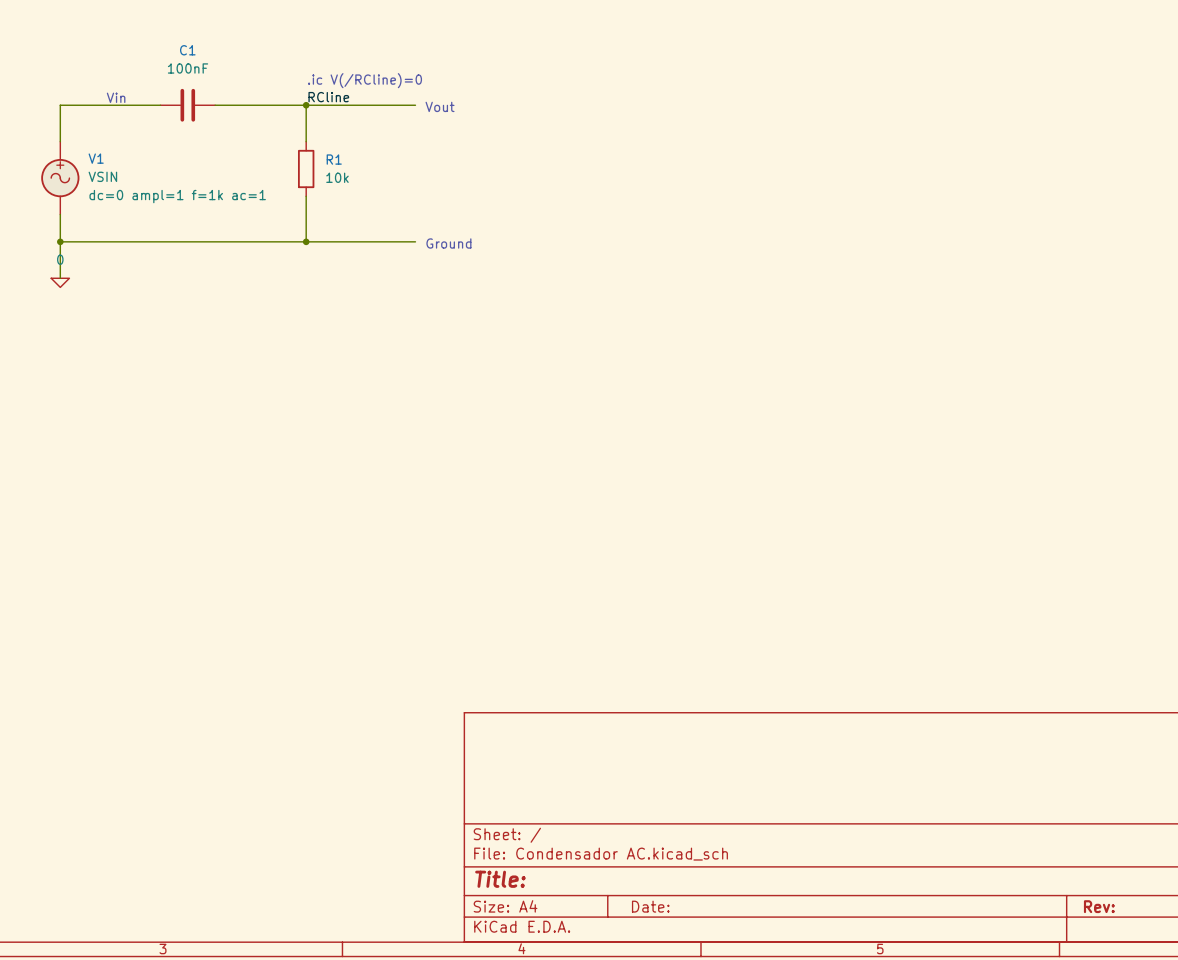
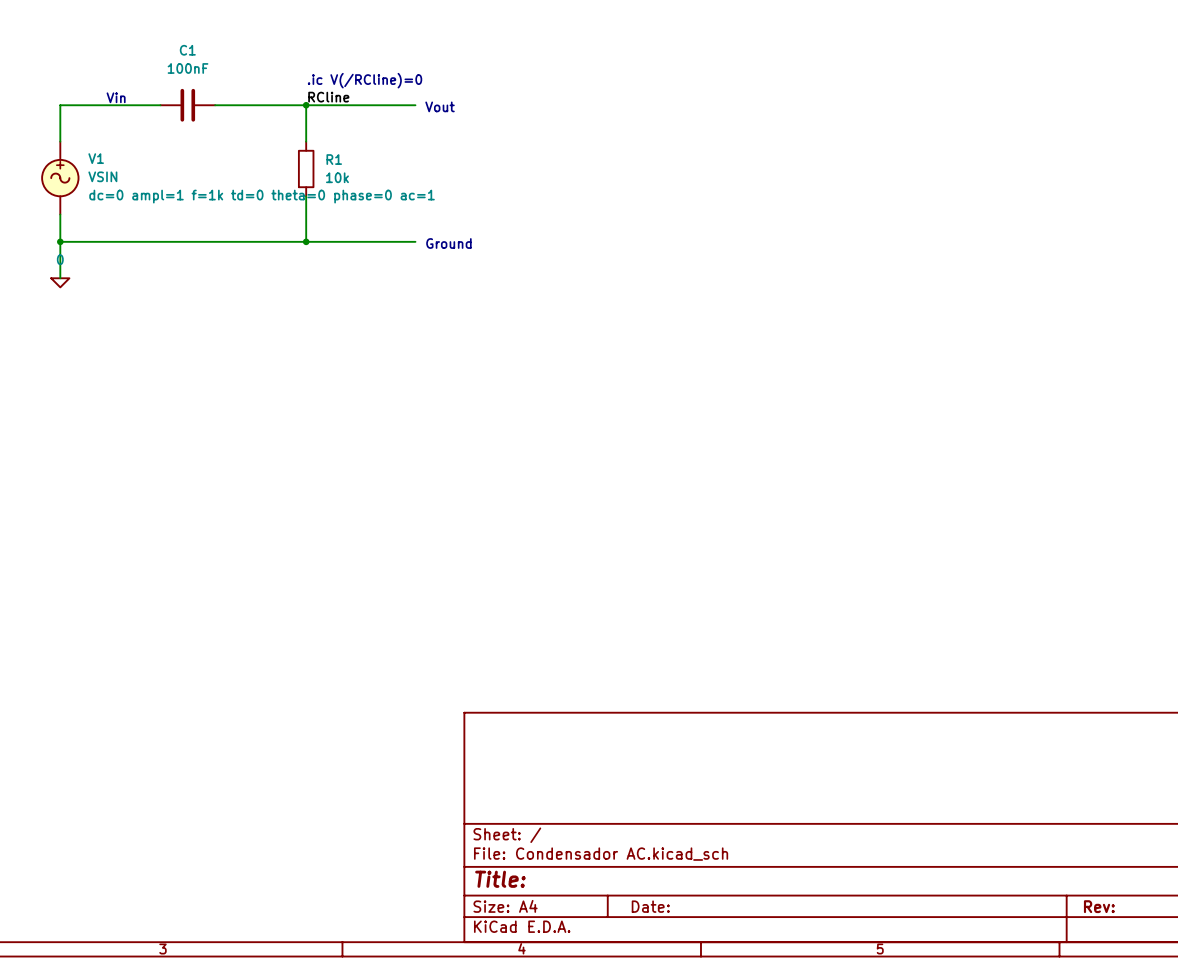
V1 text: dc=0 ampl=1 f=1k ac=1 (177, 196) -> dc=0 ampl=1 f=1k td=0 theta=0 phase=0 ac=1 (262, 196)

